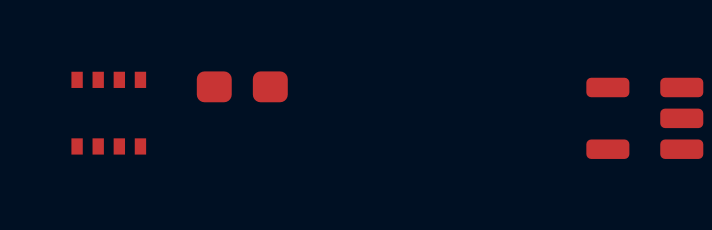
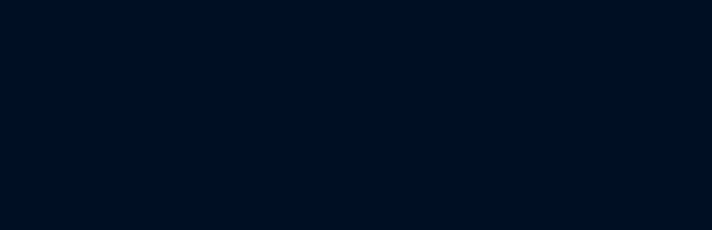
part: (242, 86) -> none
part: (108, 113) -> none
part: (644, 118) -> none

